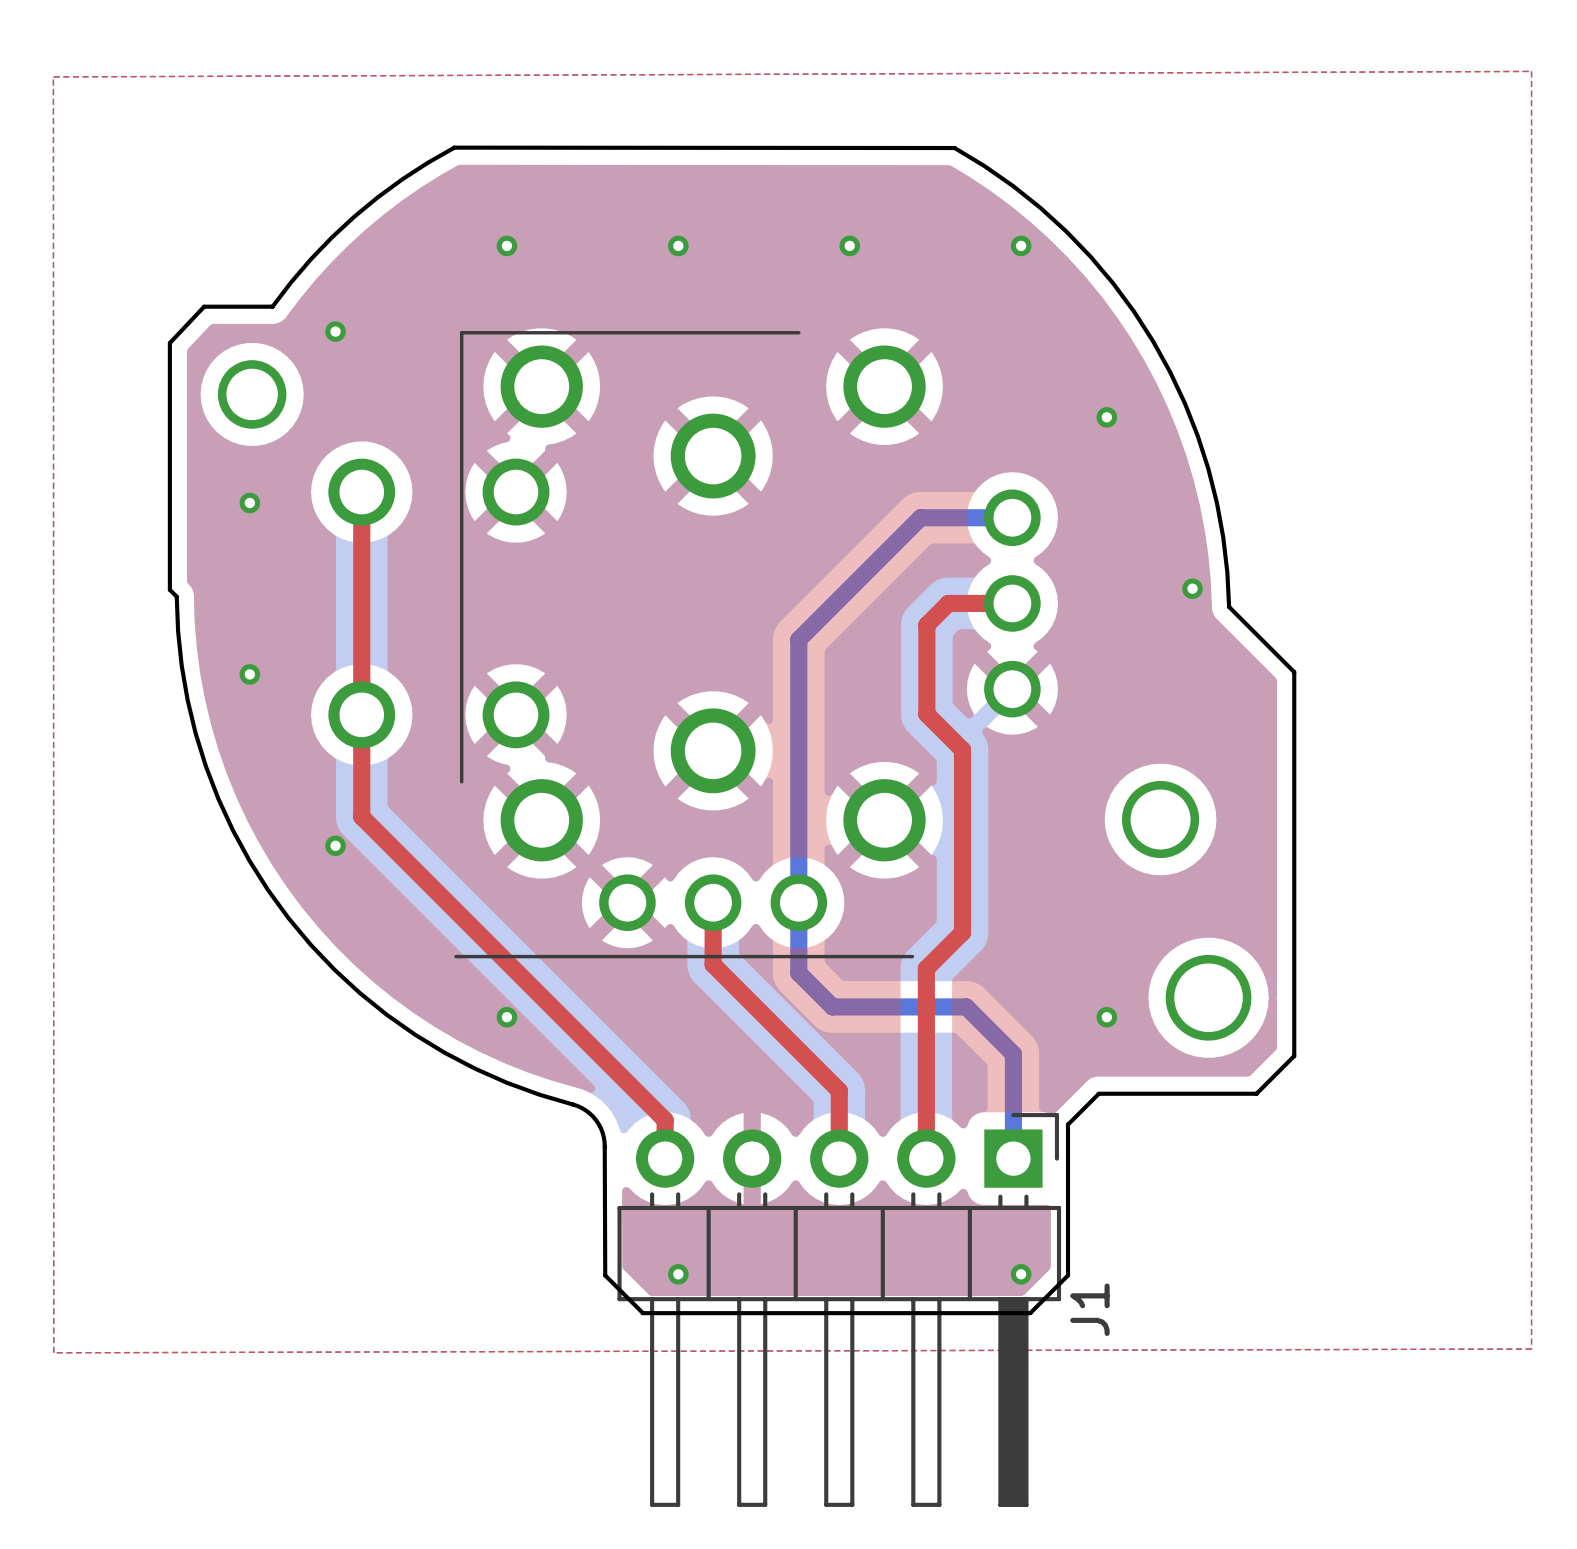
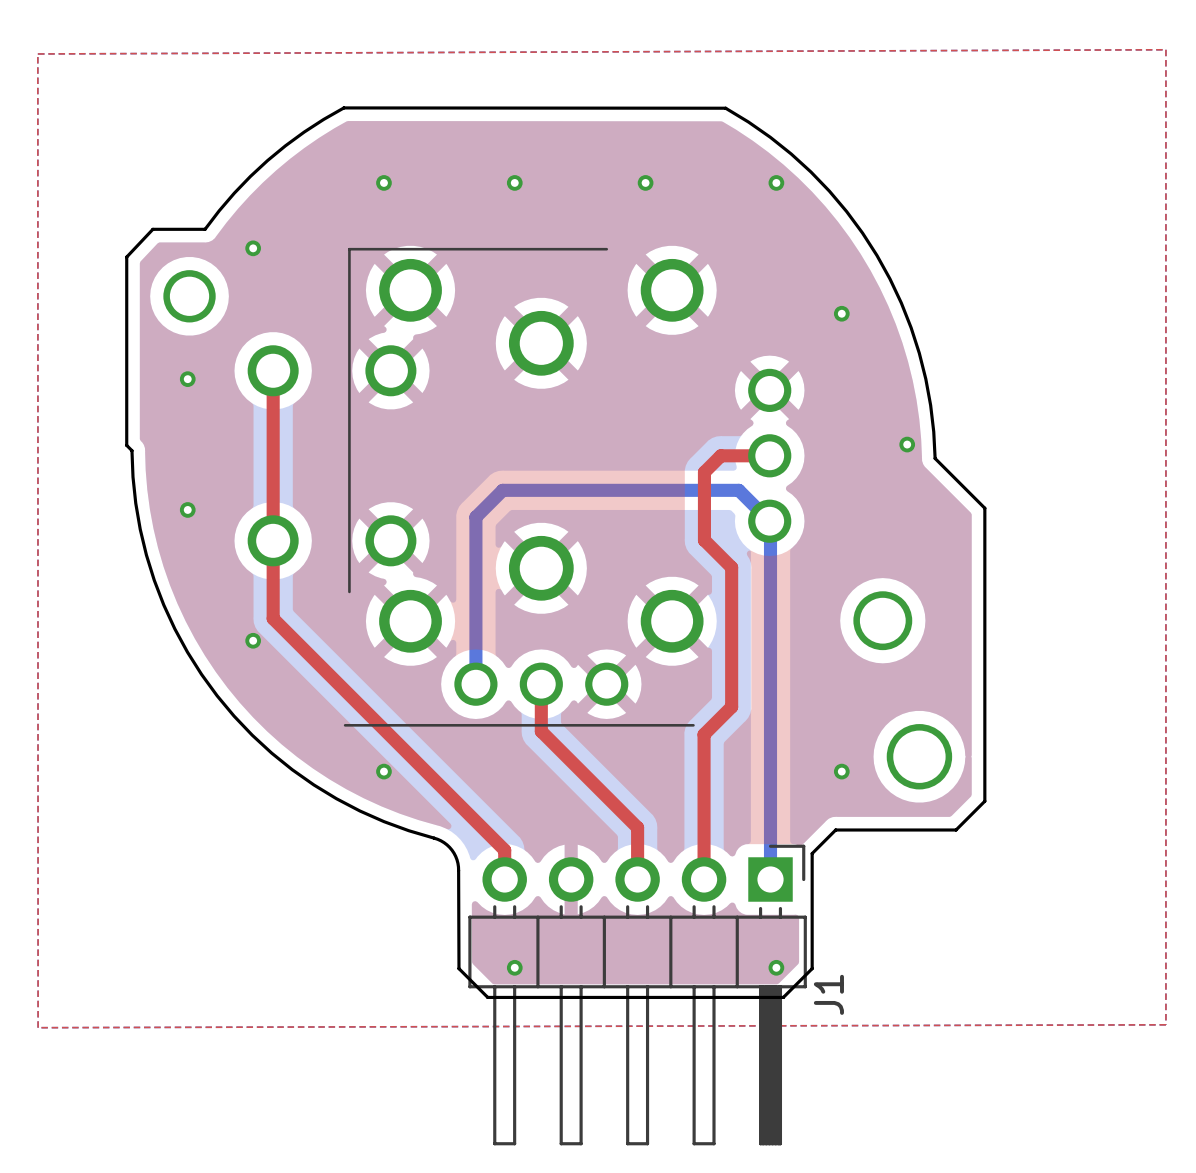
bottom track: (1012, 517) (920, 517) (798, 639) (798, 973) (832, 1006) (966, 1006) (1013, 1054) -> (475, 684) (475, 517) (502, 490) (738, 490) (770, 521) (770, 799)

